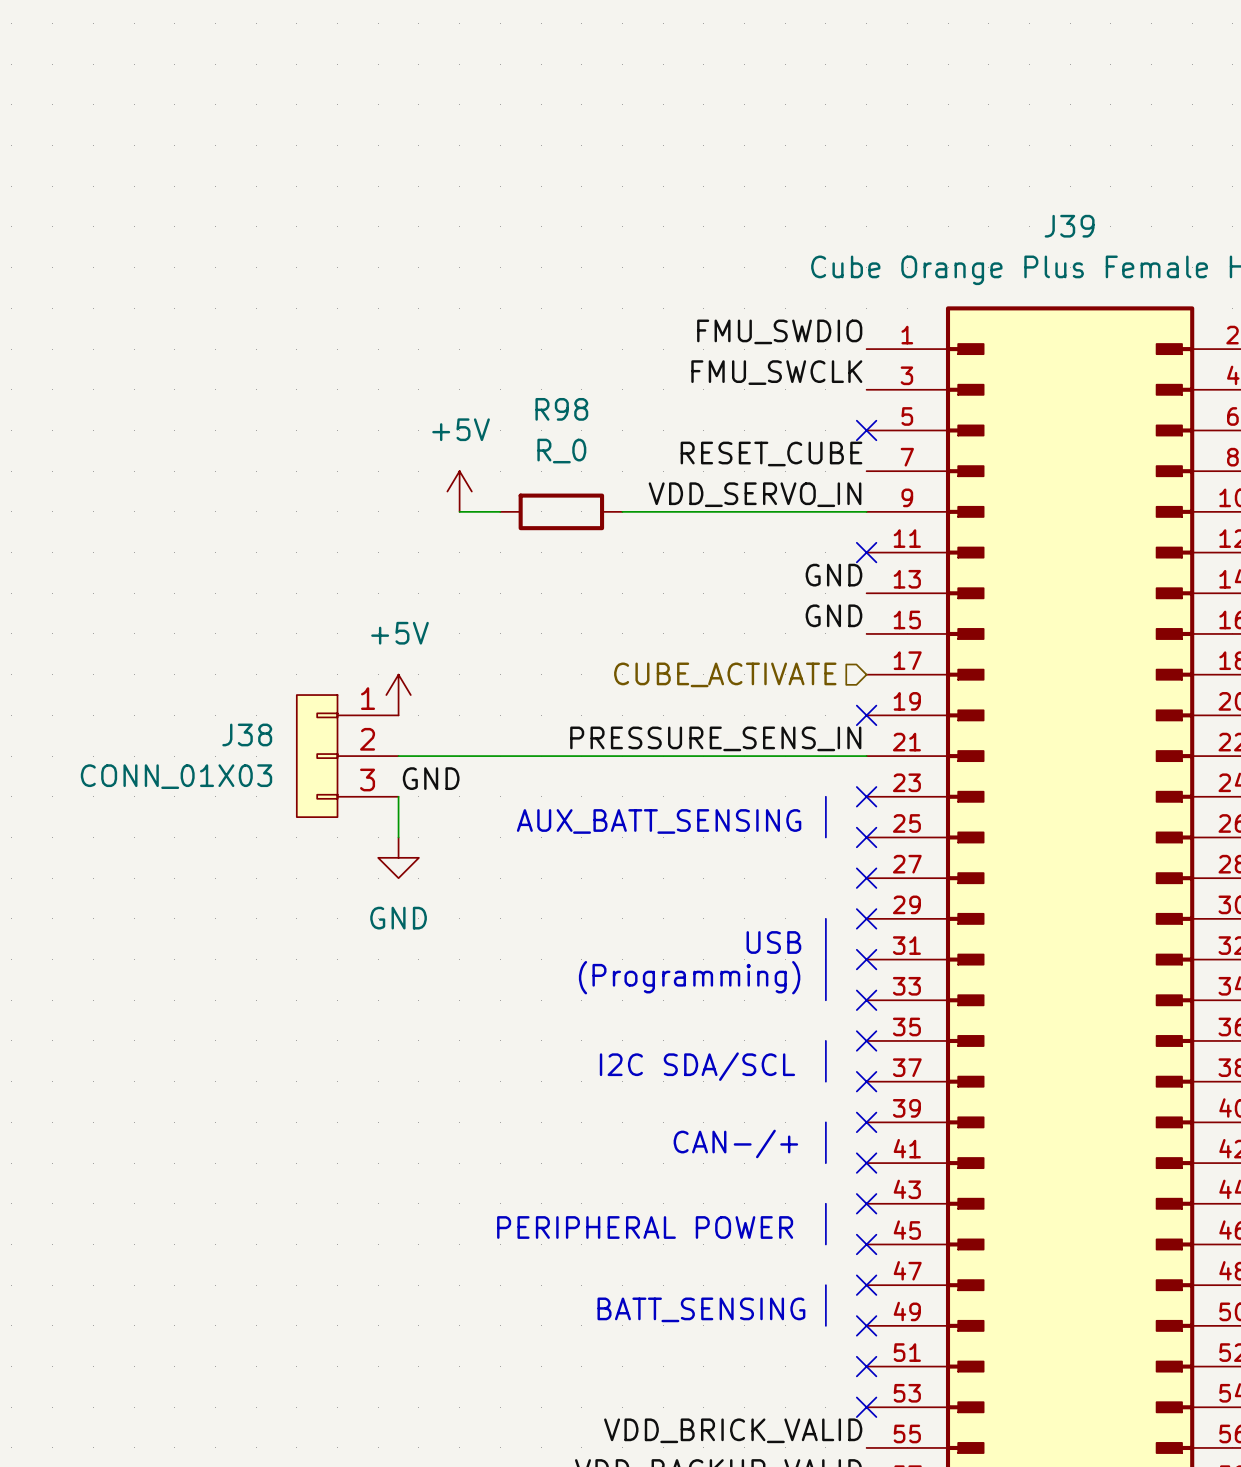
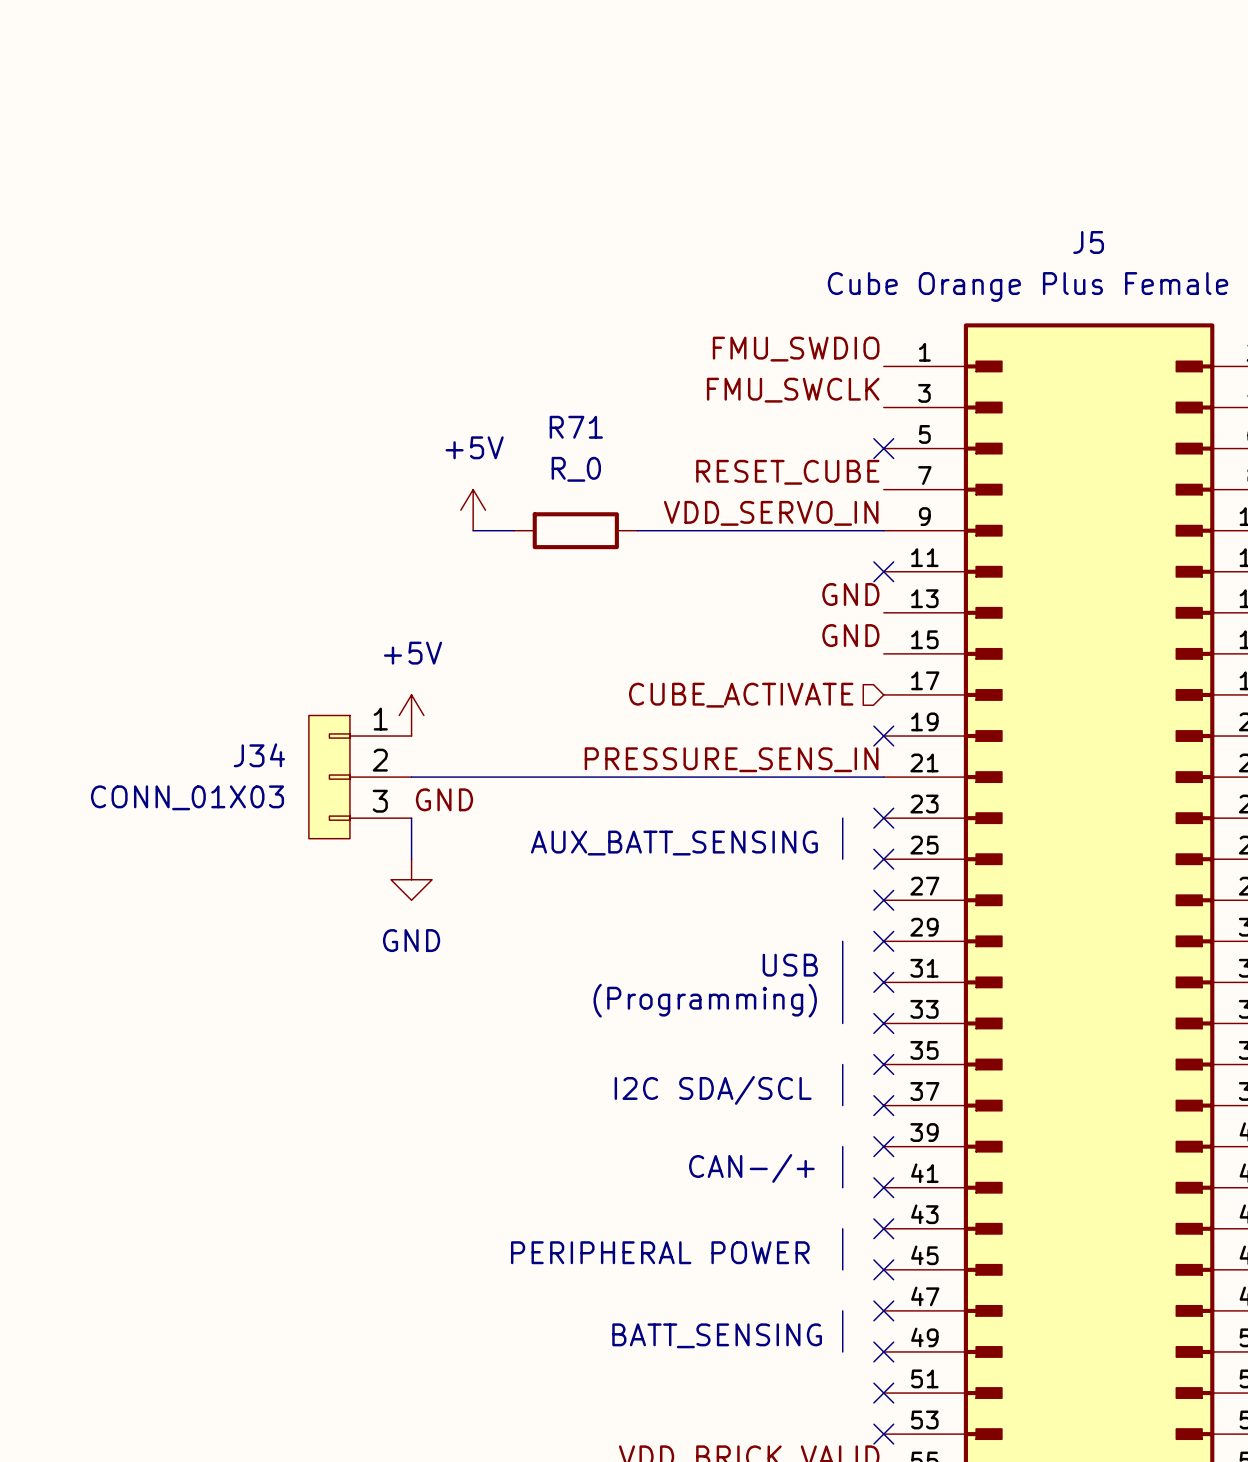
J39 name: J39 (1069, 226) -> J5 (1088, 242)
R98 name: R98 (561, 409) -> R71 (576, 427)
J38 name: J38 (247, 734) -> J34 (259, 755)

